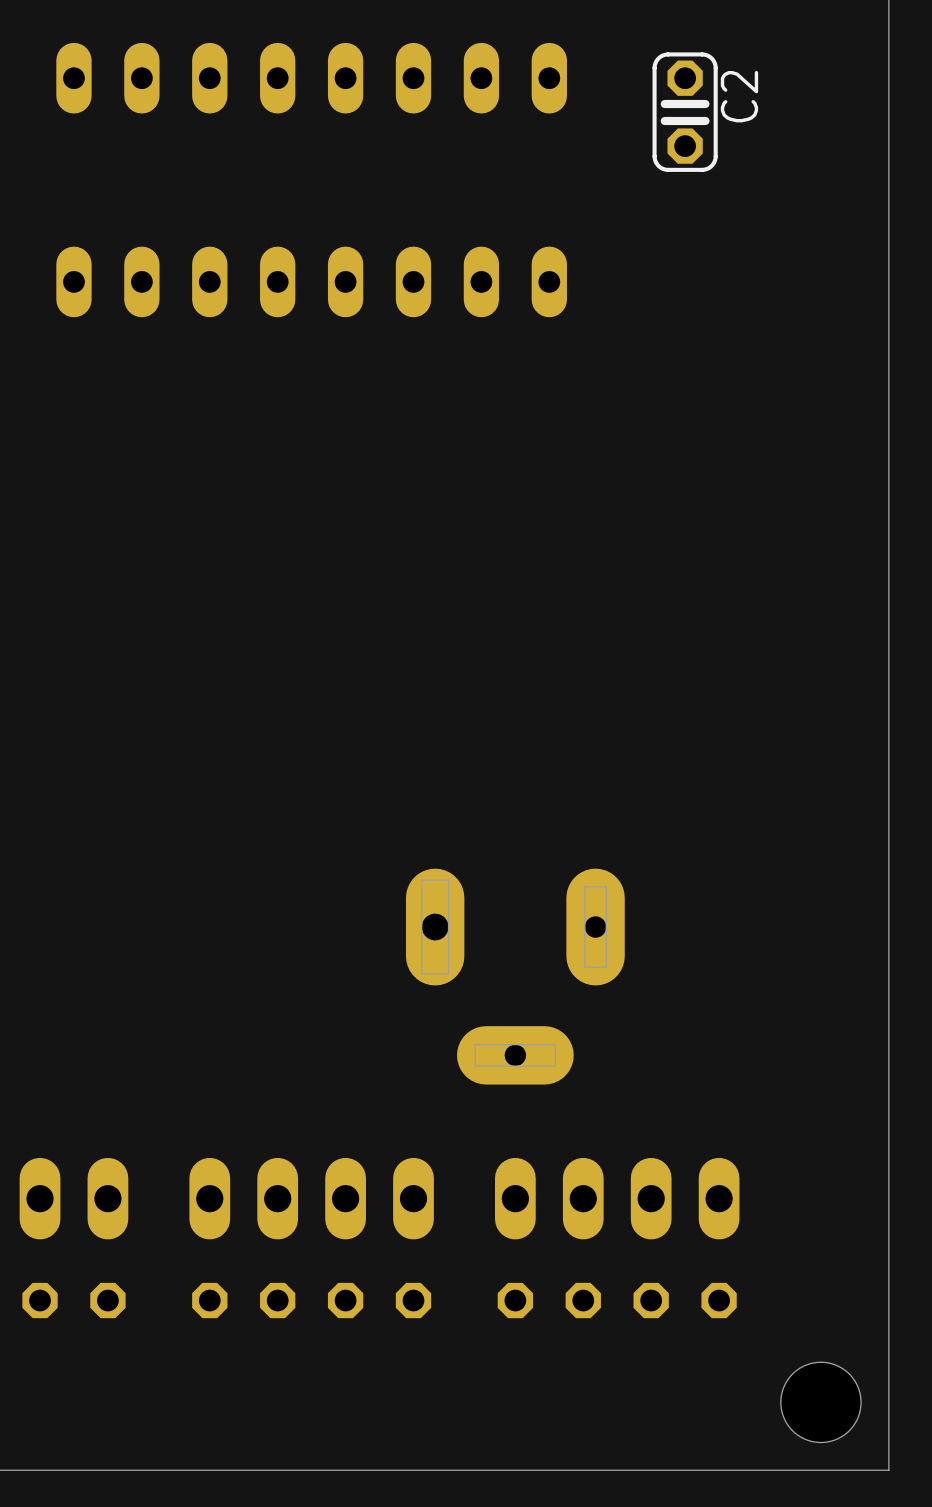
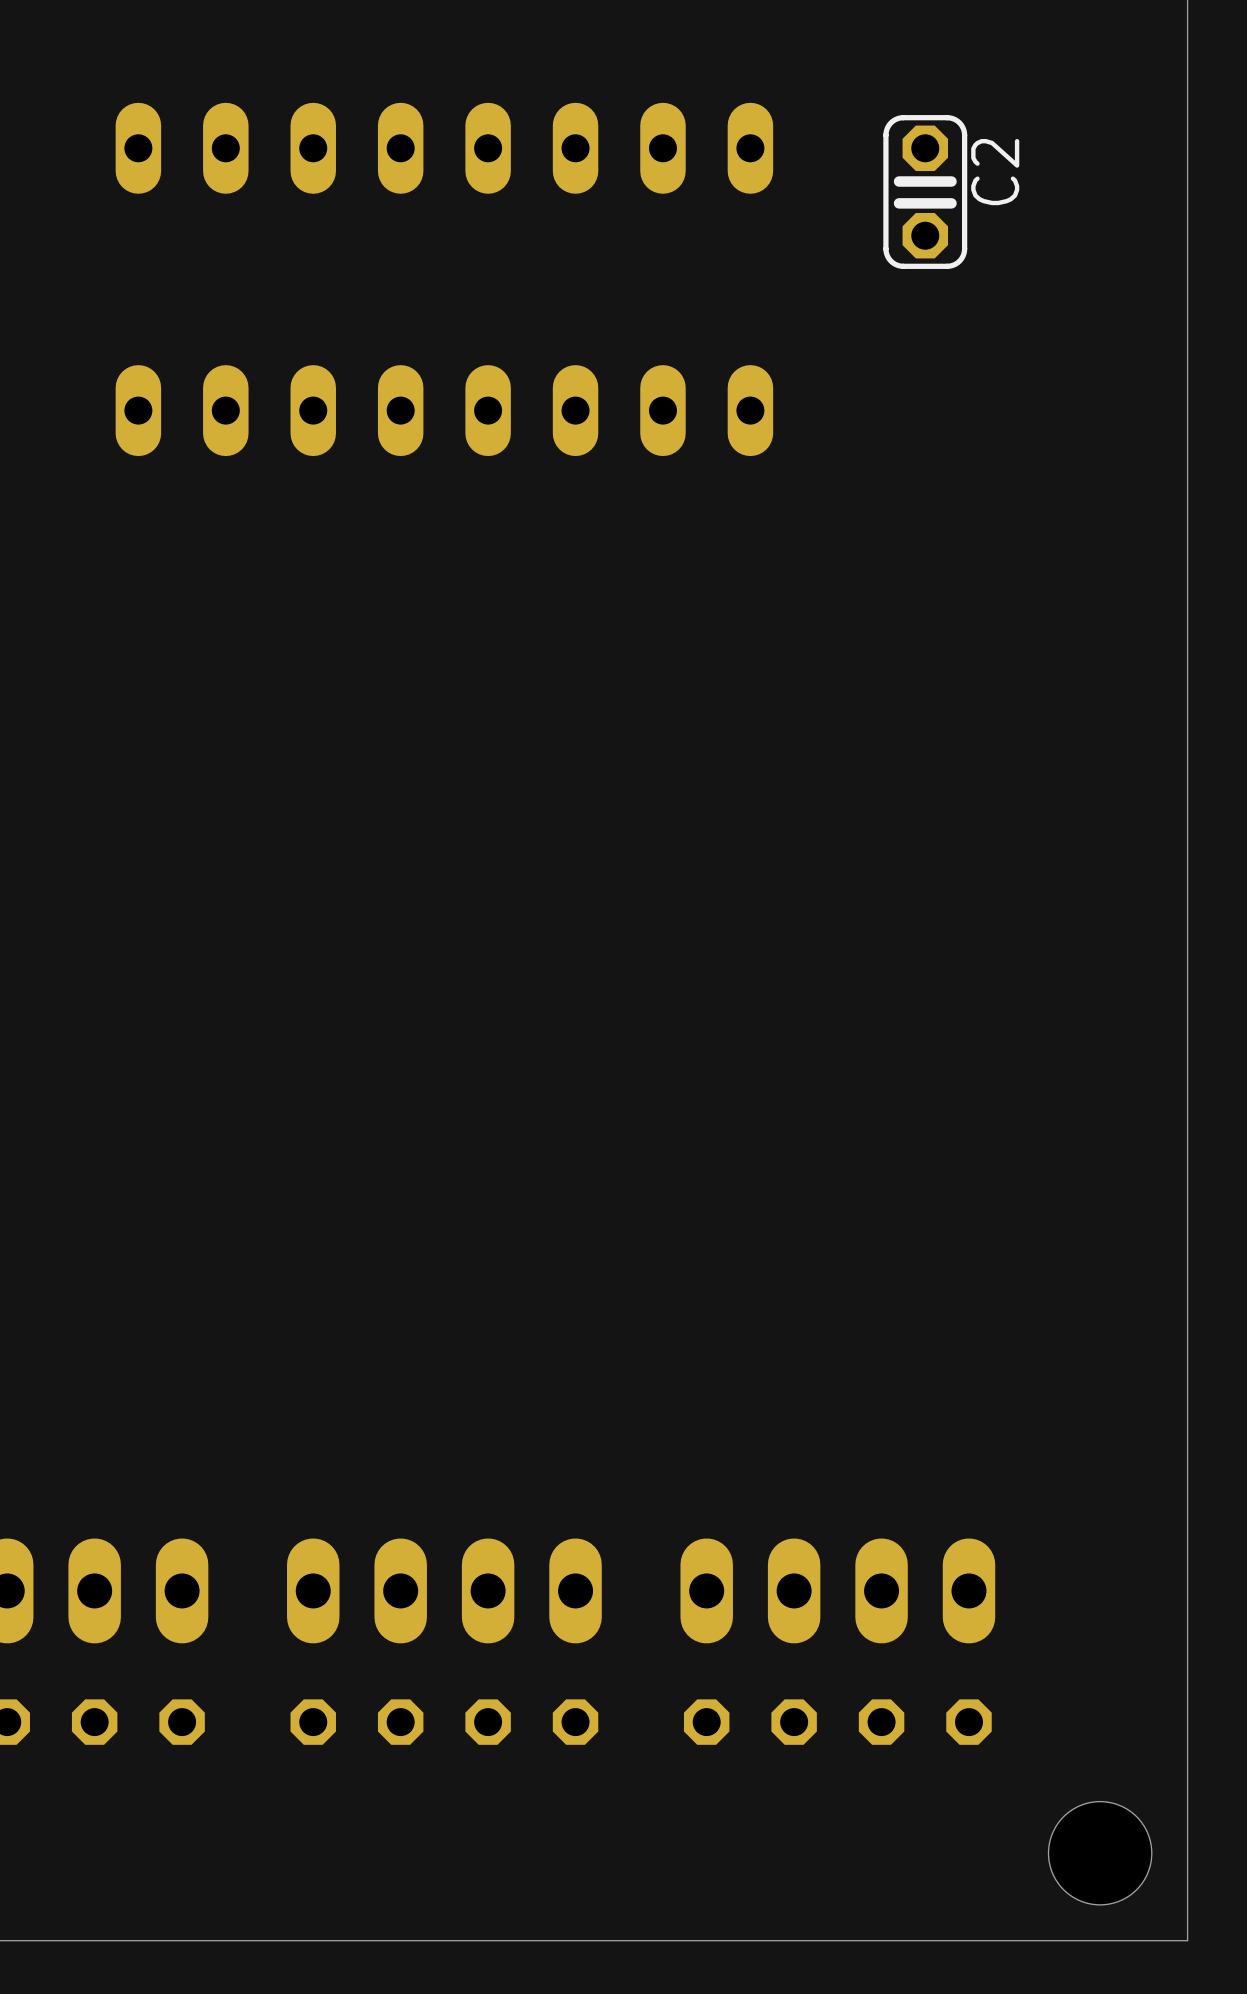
part: (515, 976) -> none

